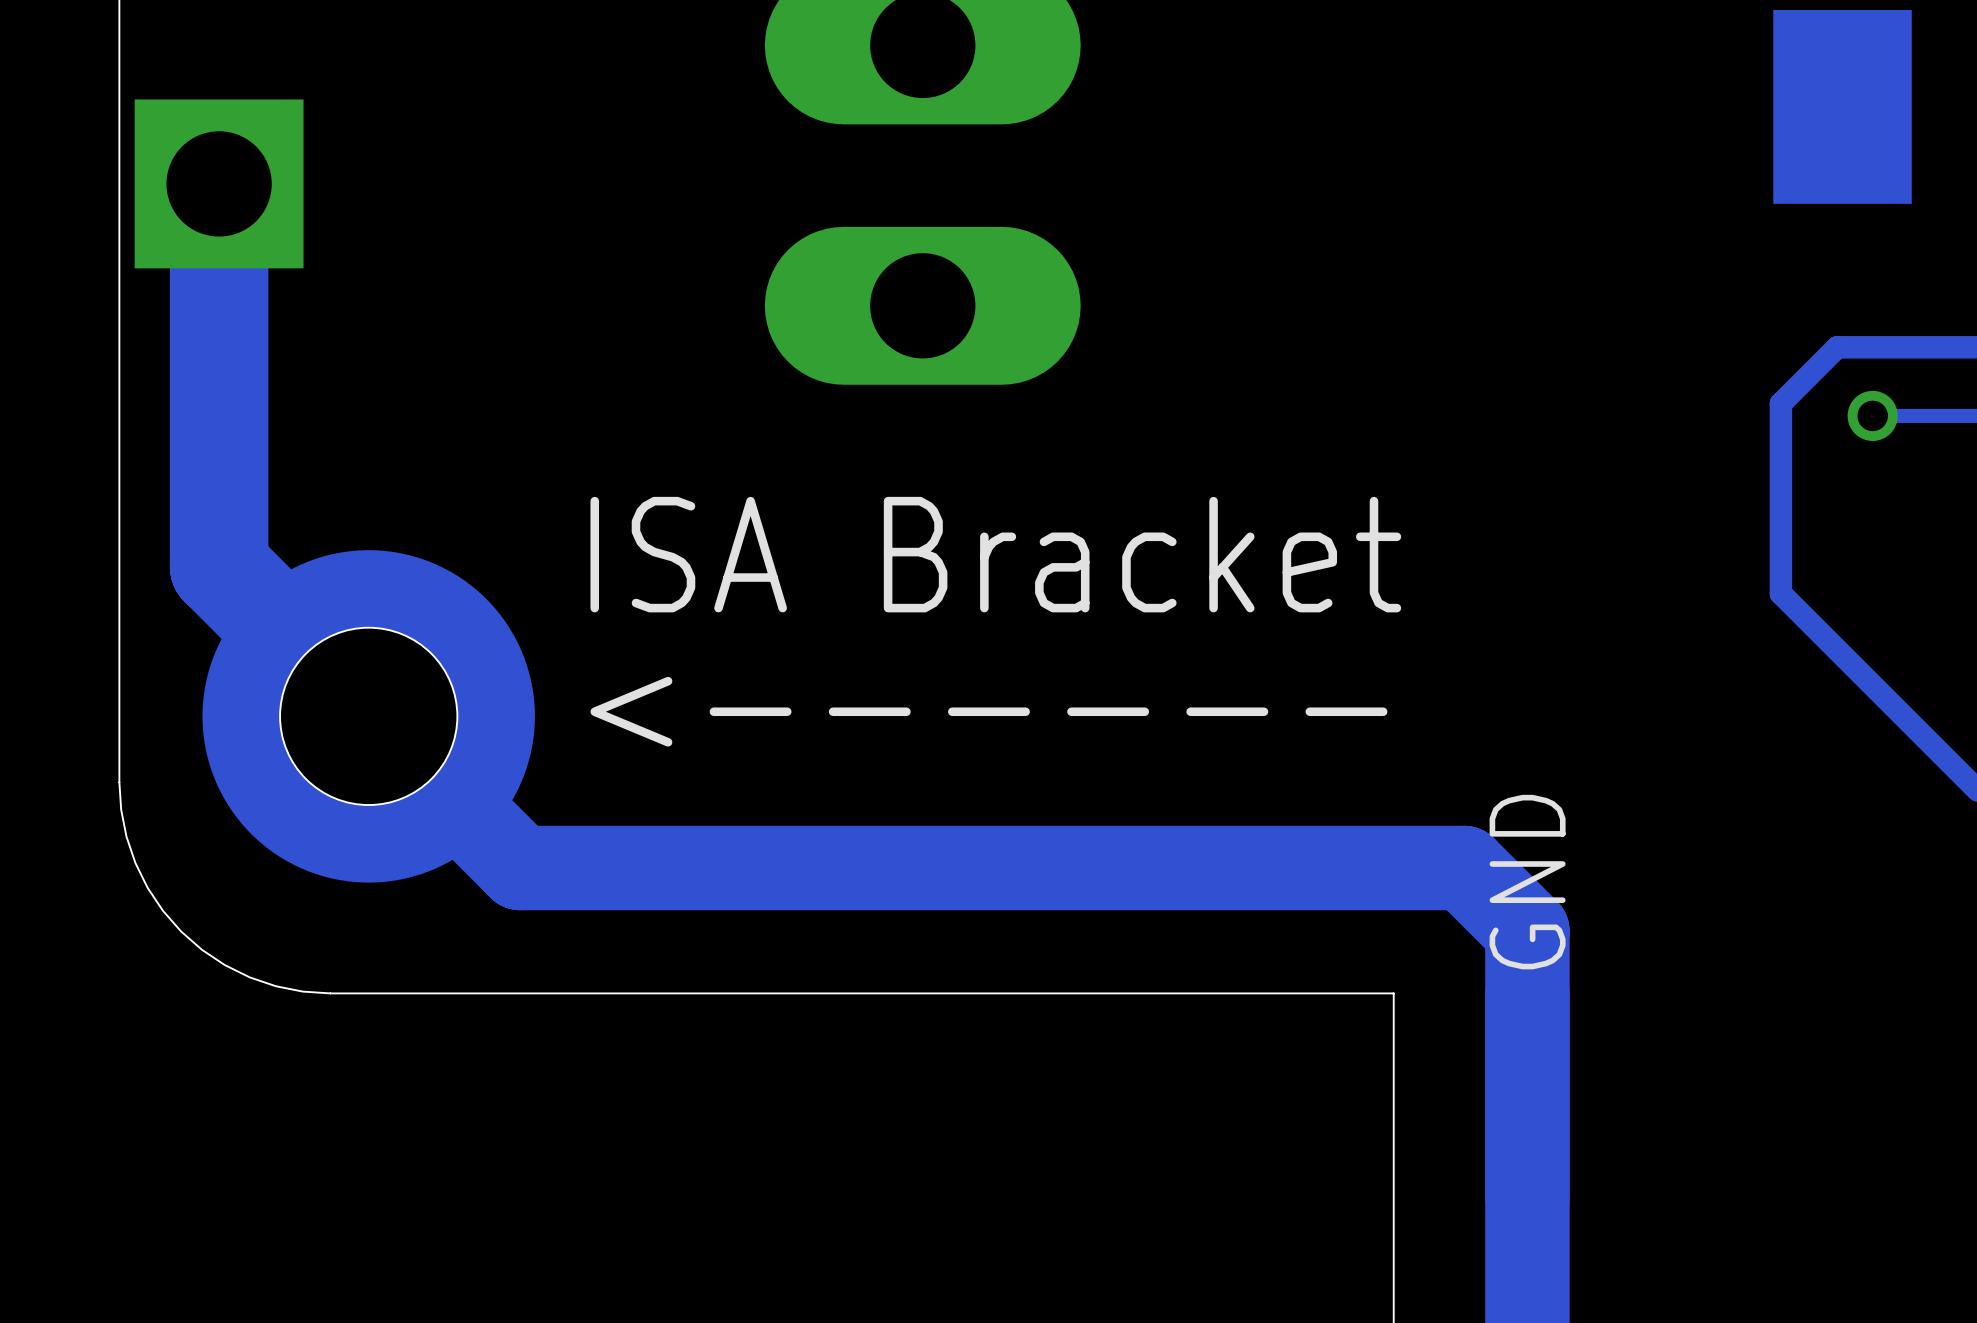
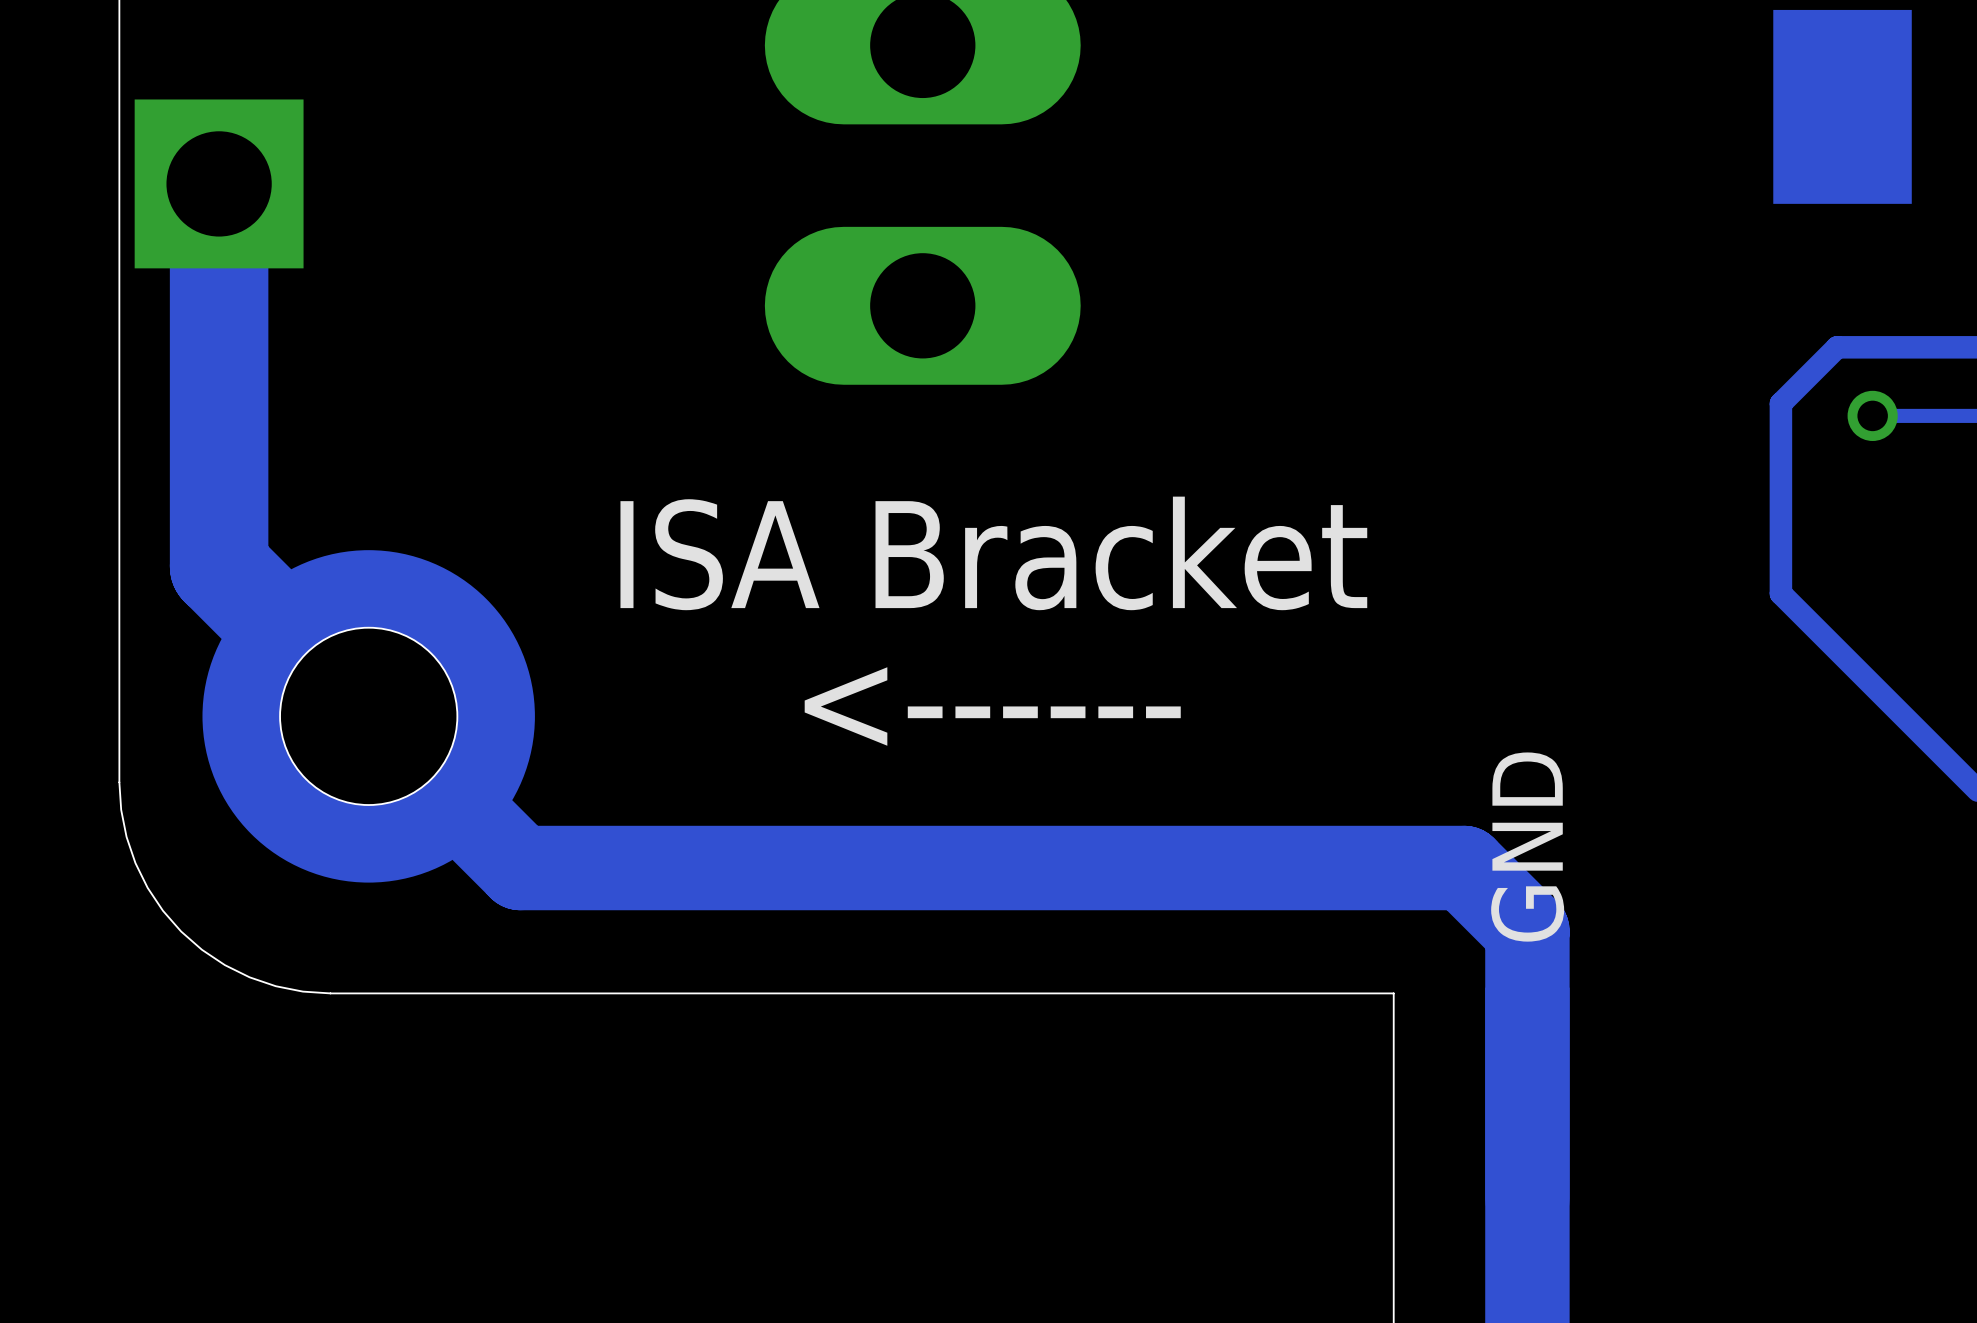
text position: GND (1527, 882) -> GND (1527, 847)

